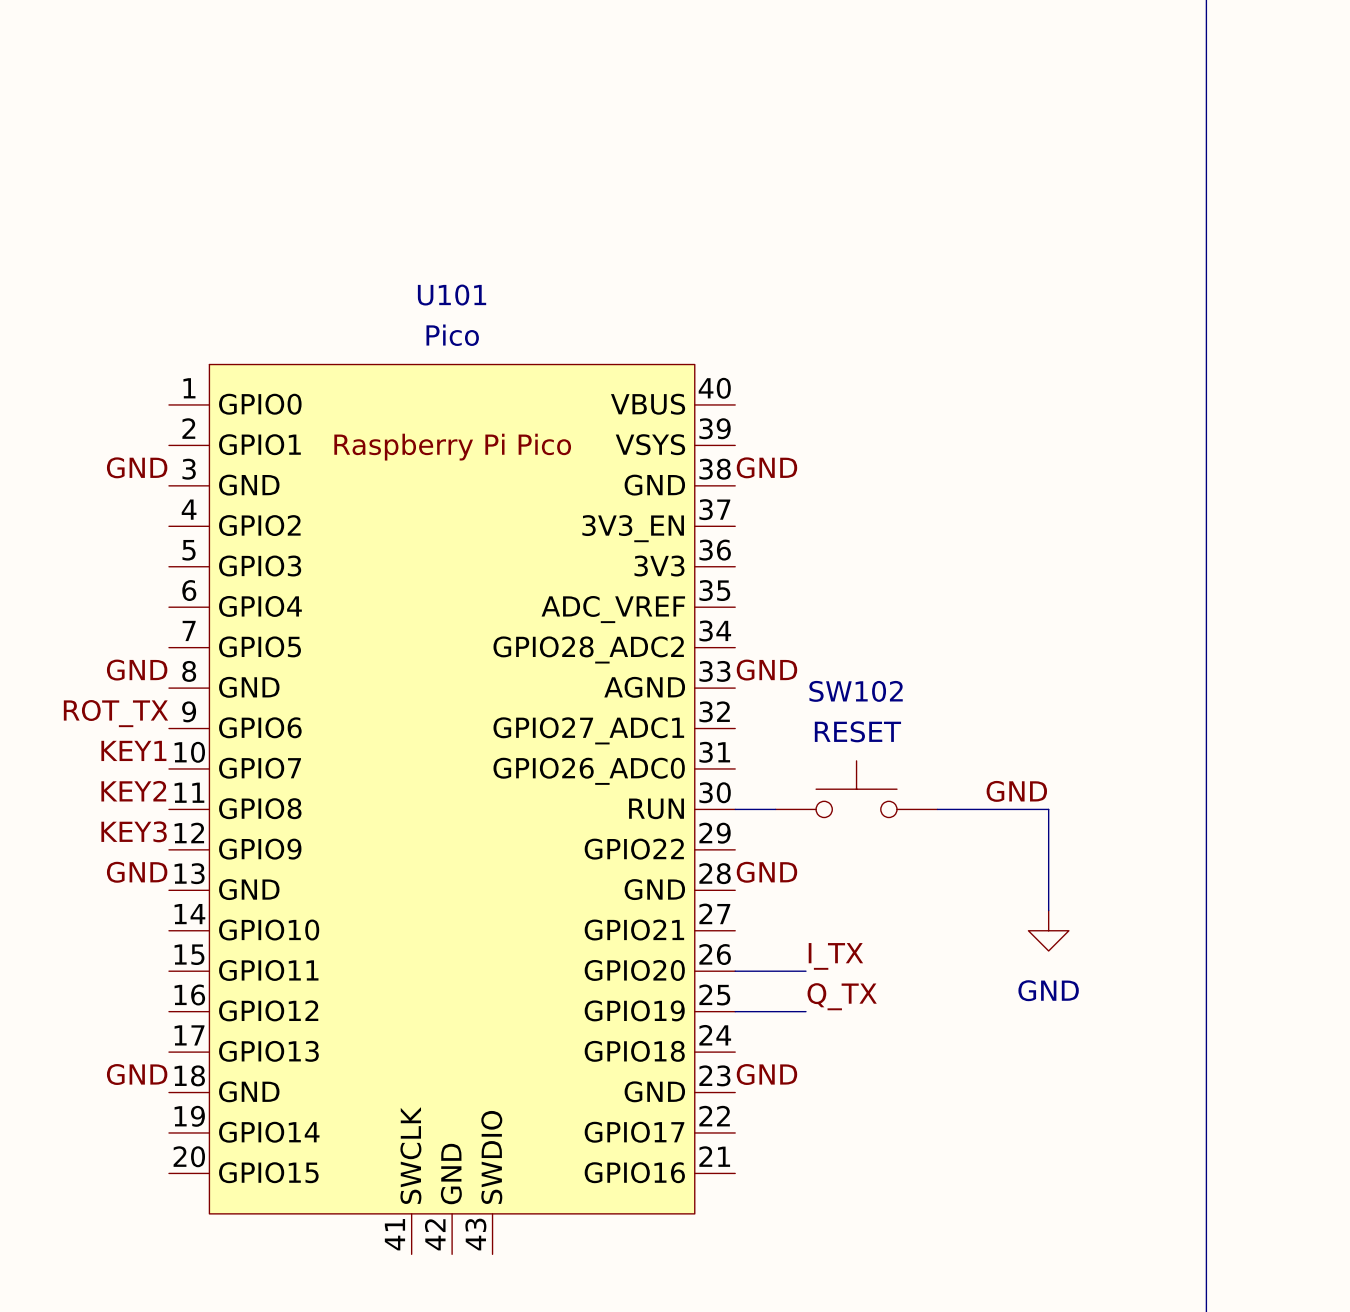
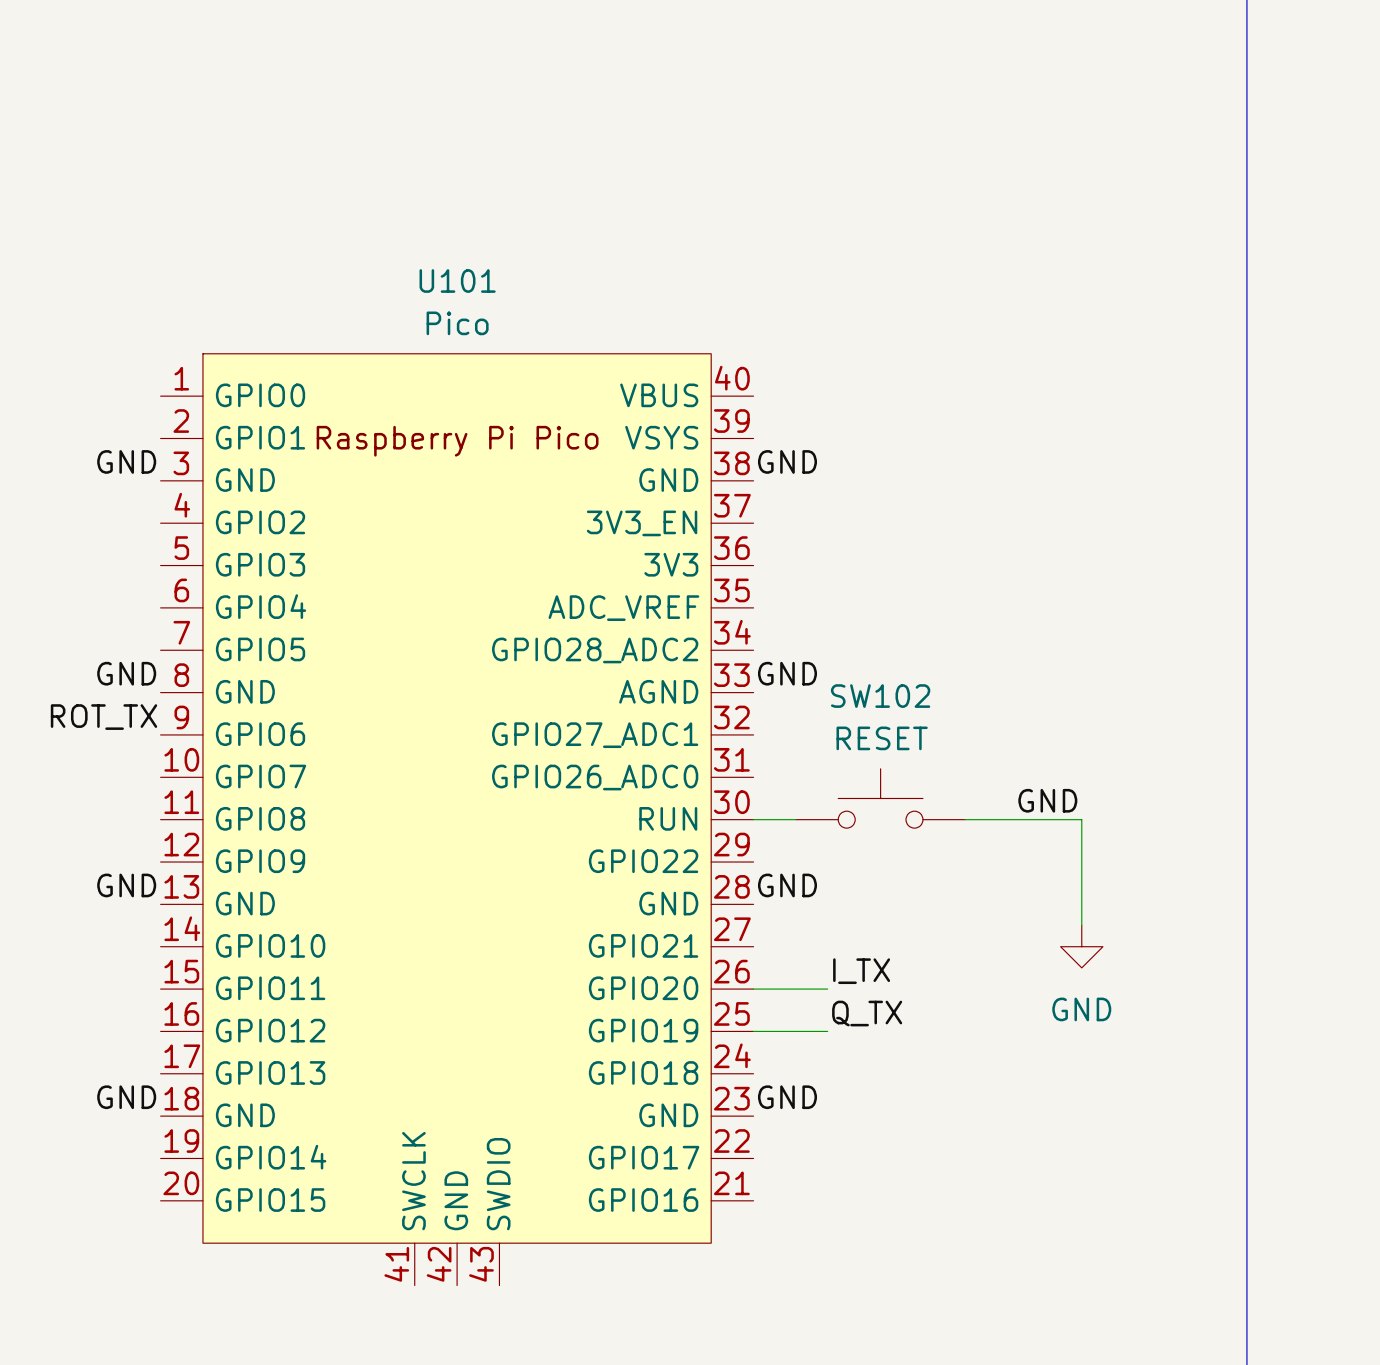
label: KEY1 (133, 750) -> none
label: KEY2 (133, 791) -> none
label: KEY3 (134, 831) -> none

